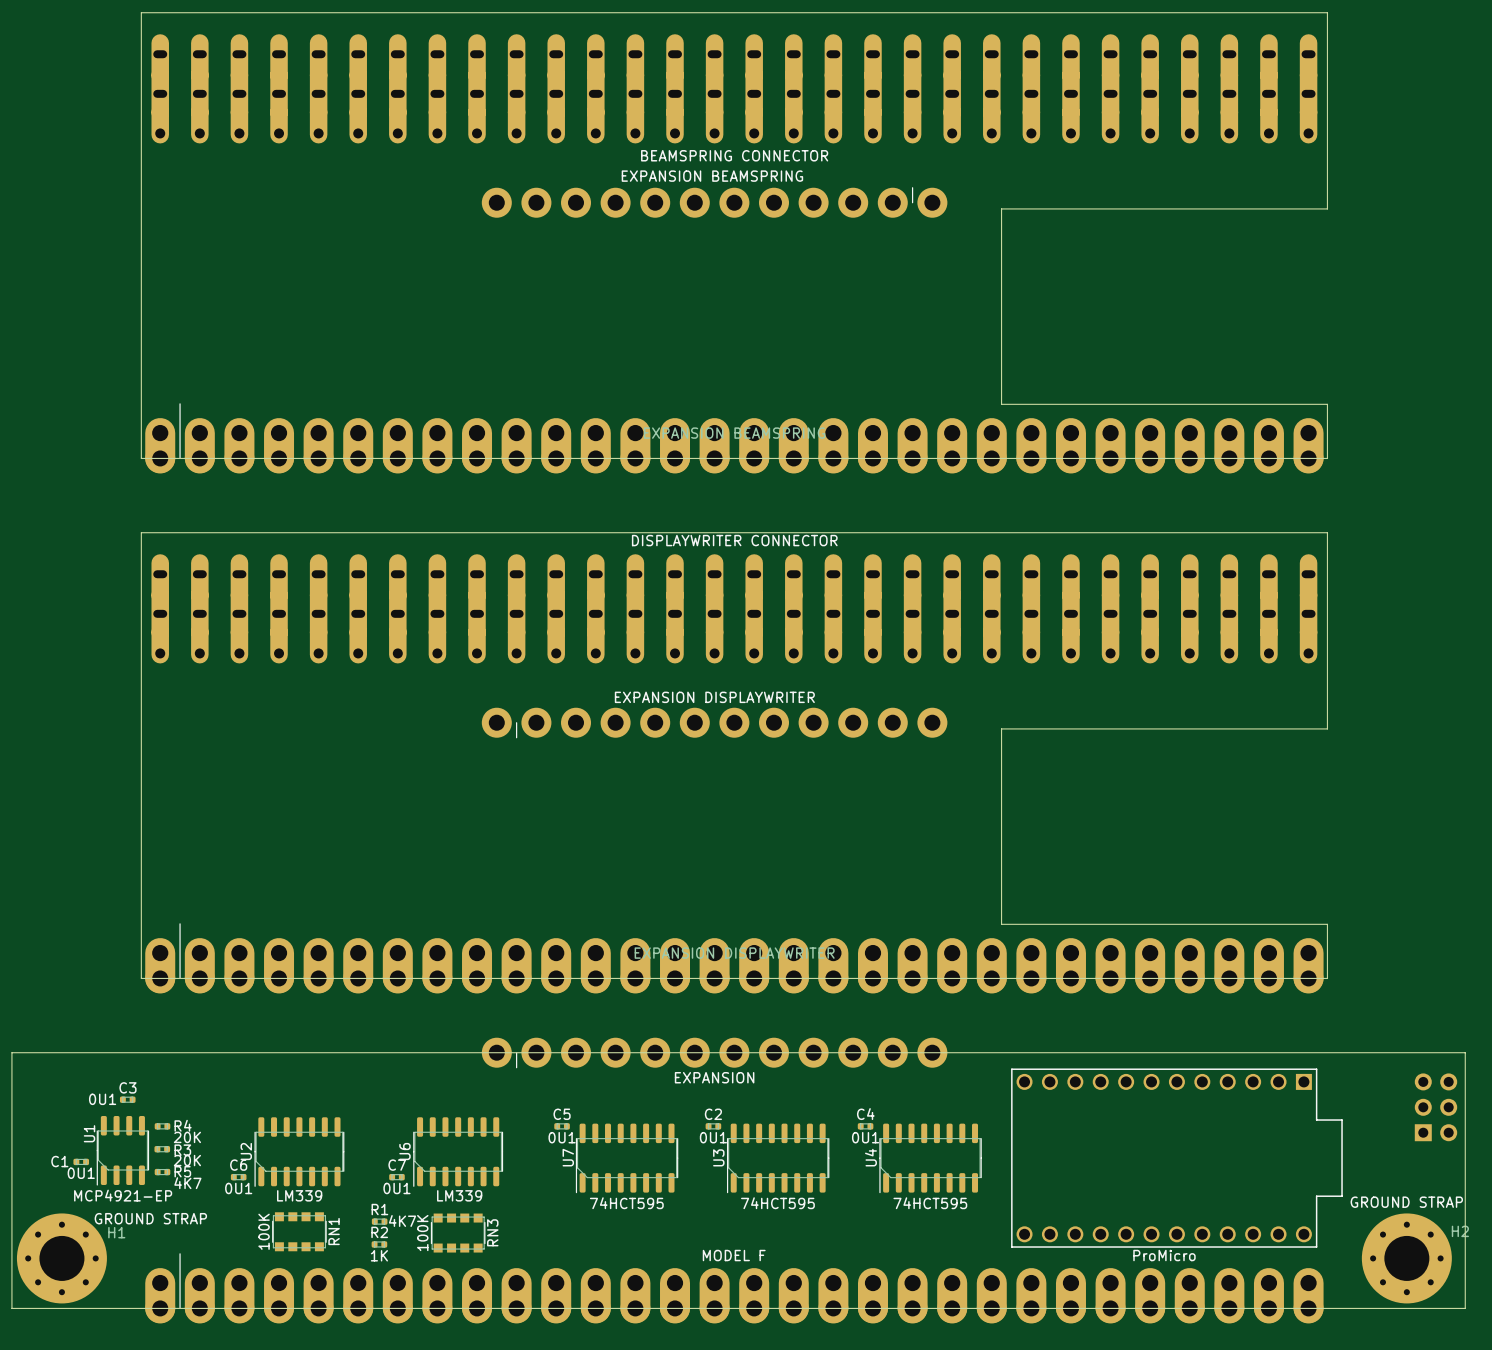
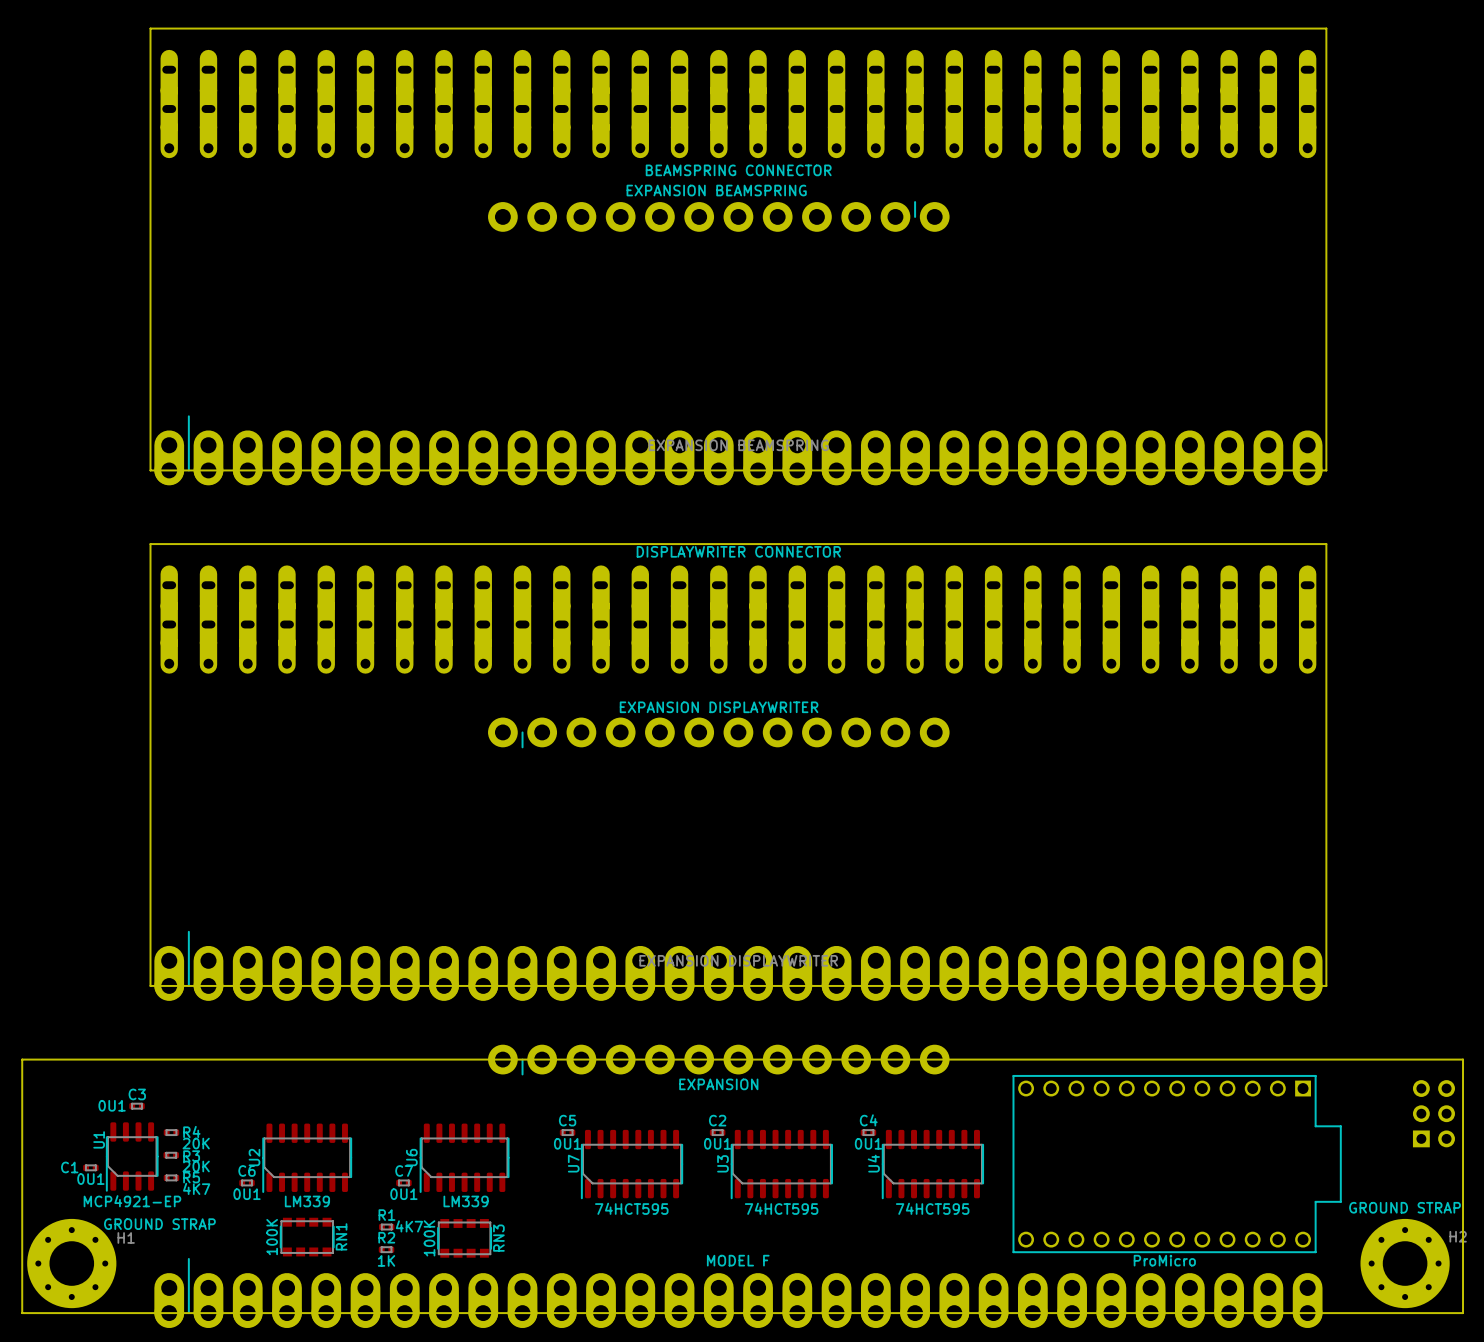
board edge: (1327, 208) (1001, 208) (1001, 404) (1327, 404) -> (1326, 223) (1326, 416)
board edge: (1327, 728) (1001, 728) (1001, 924) (1327, 924) -> (1326, 738) (1326, 932)

